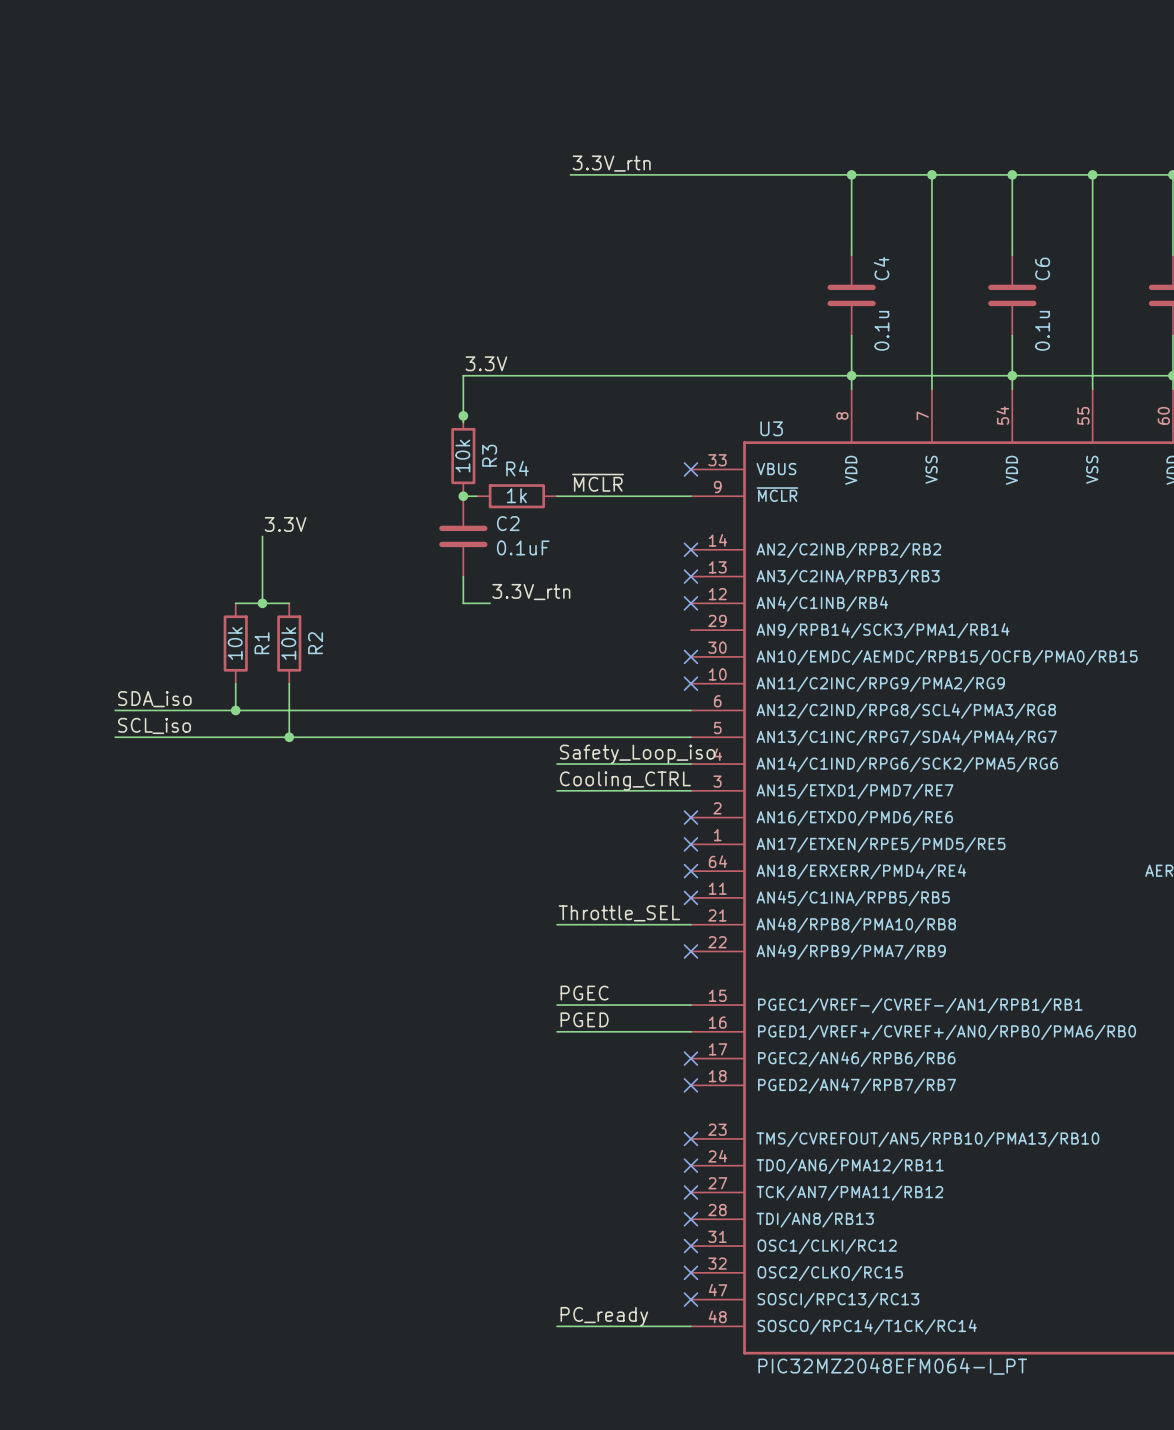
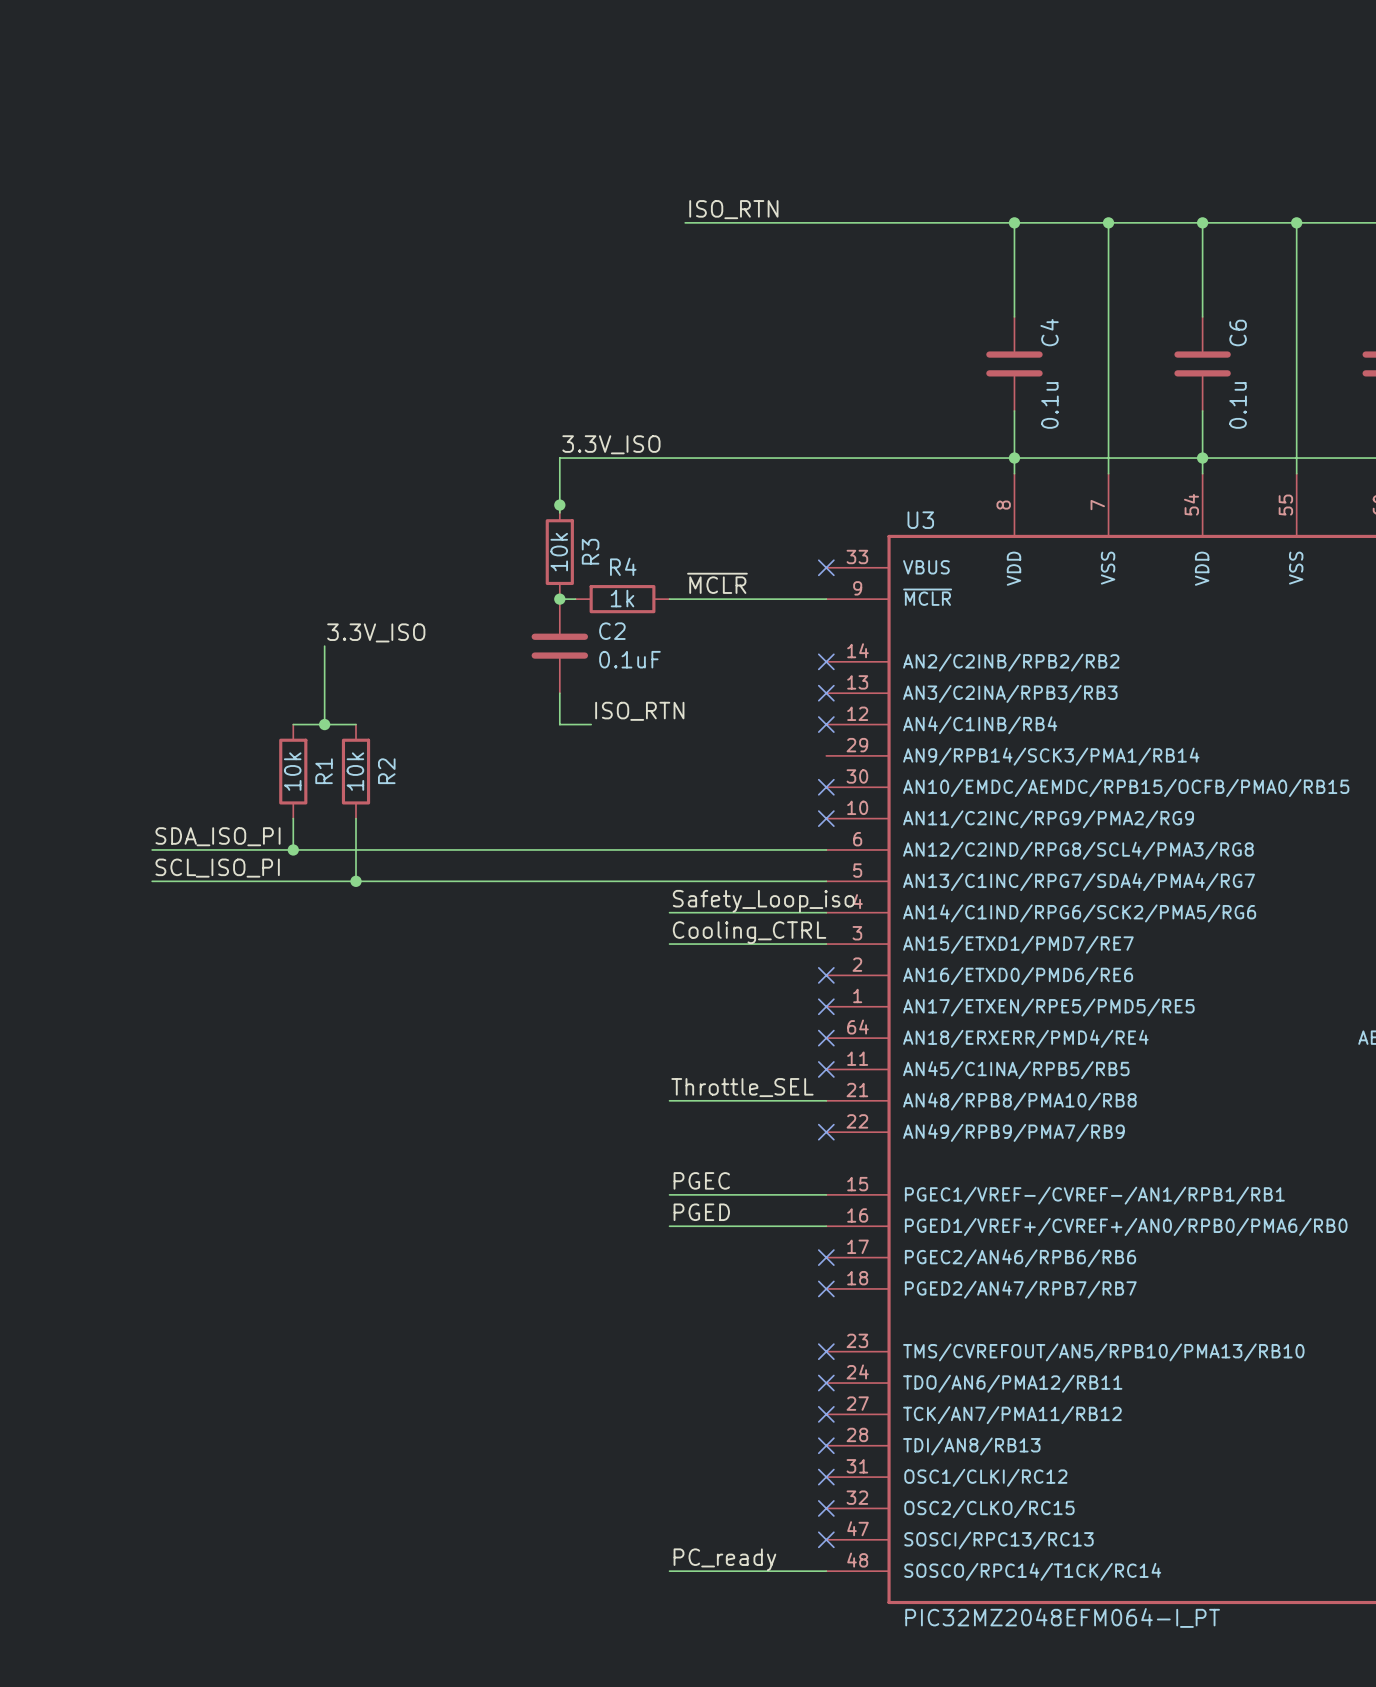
label: 3.3V_rtn (611, 163) -> ISO_RTN (733, 209)
label: 3.3V (486, 363) -> 3.3V_ISO (611, 444)
label: 3.3V (285, 524) -> 3.3V_ISO (376, 632)
label: 3.3V_rtn (531, 592) -> ISO_RTN (639, 711)
label: SDA_iso (154, 699) -> SDA_ISO_PI (218, 836)
label: SCL_iso (154, 725) -> SCL_ISO_PI (217, 868)

